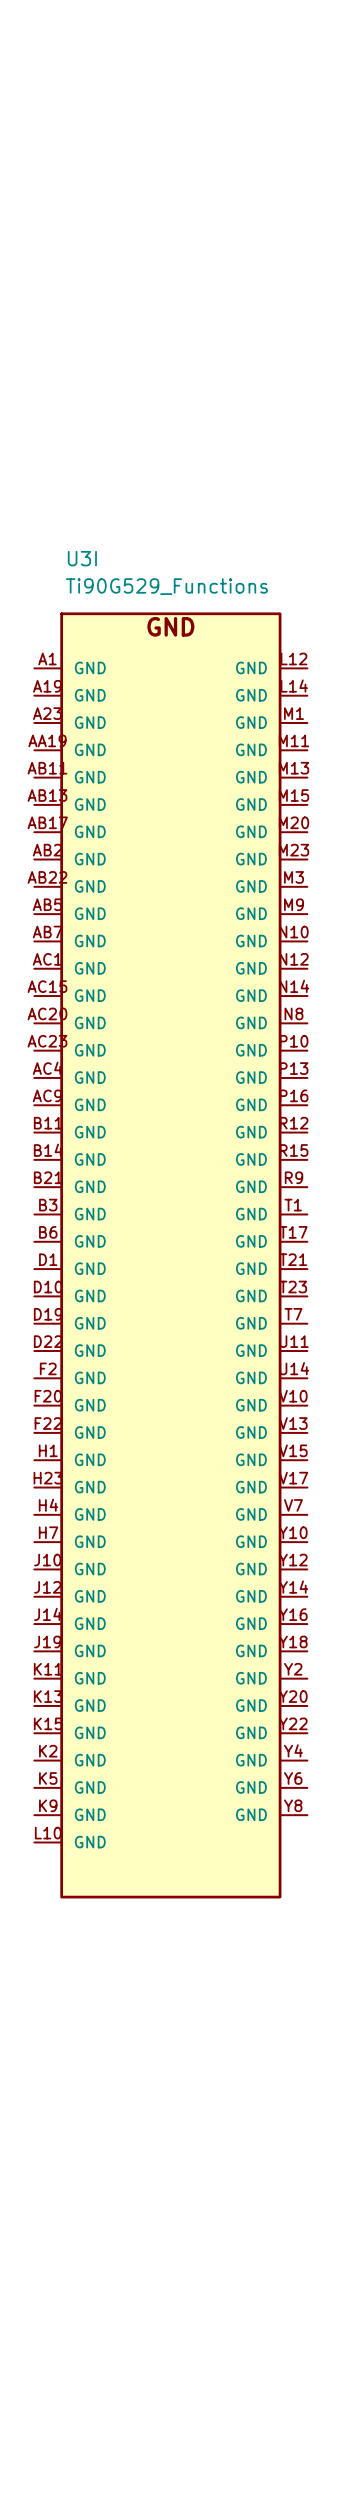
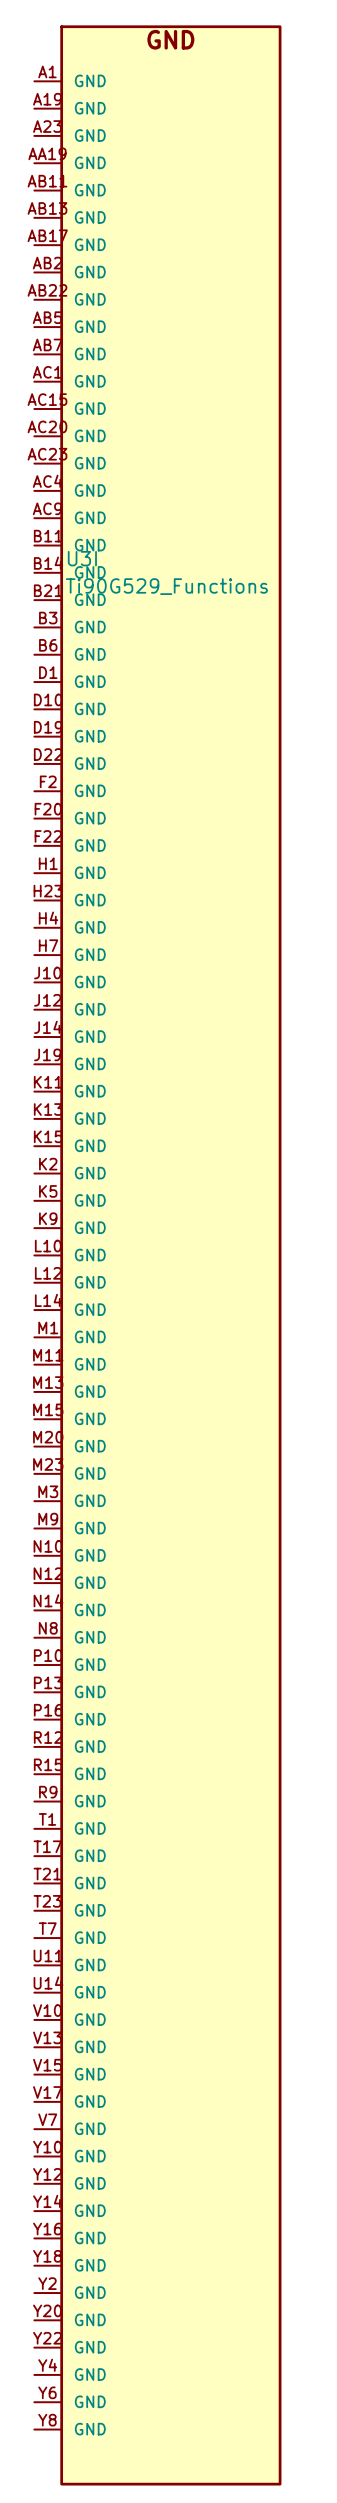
U3I symbol: [34, 612, 308, 1899] -> [34, 25, 282, 2486]

